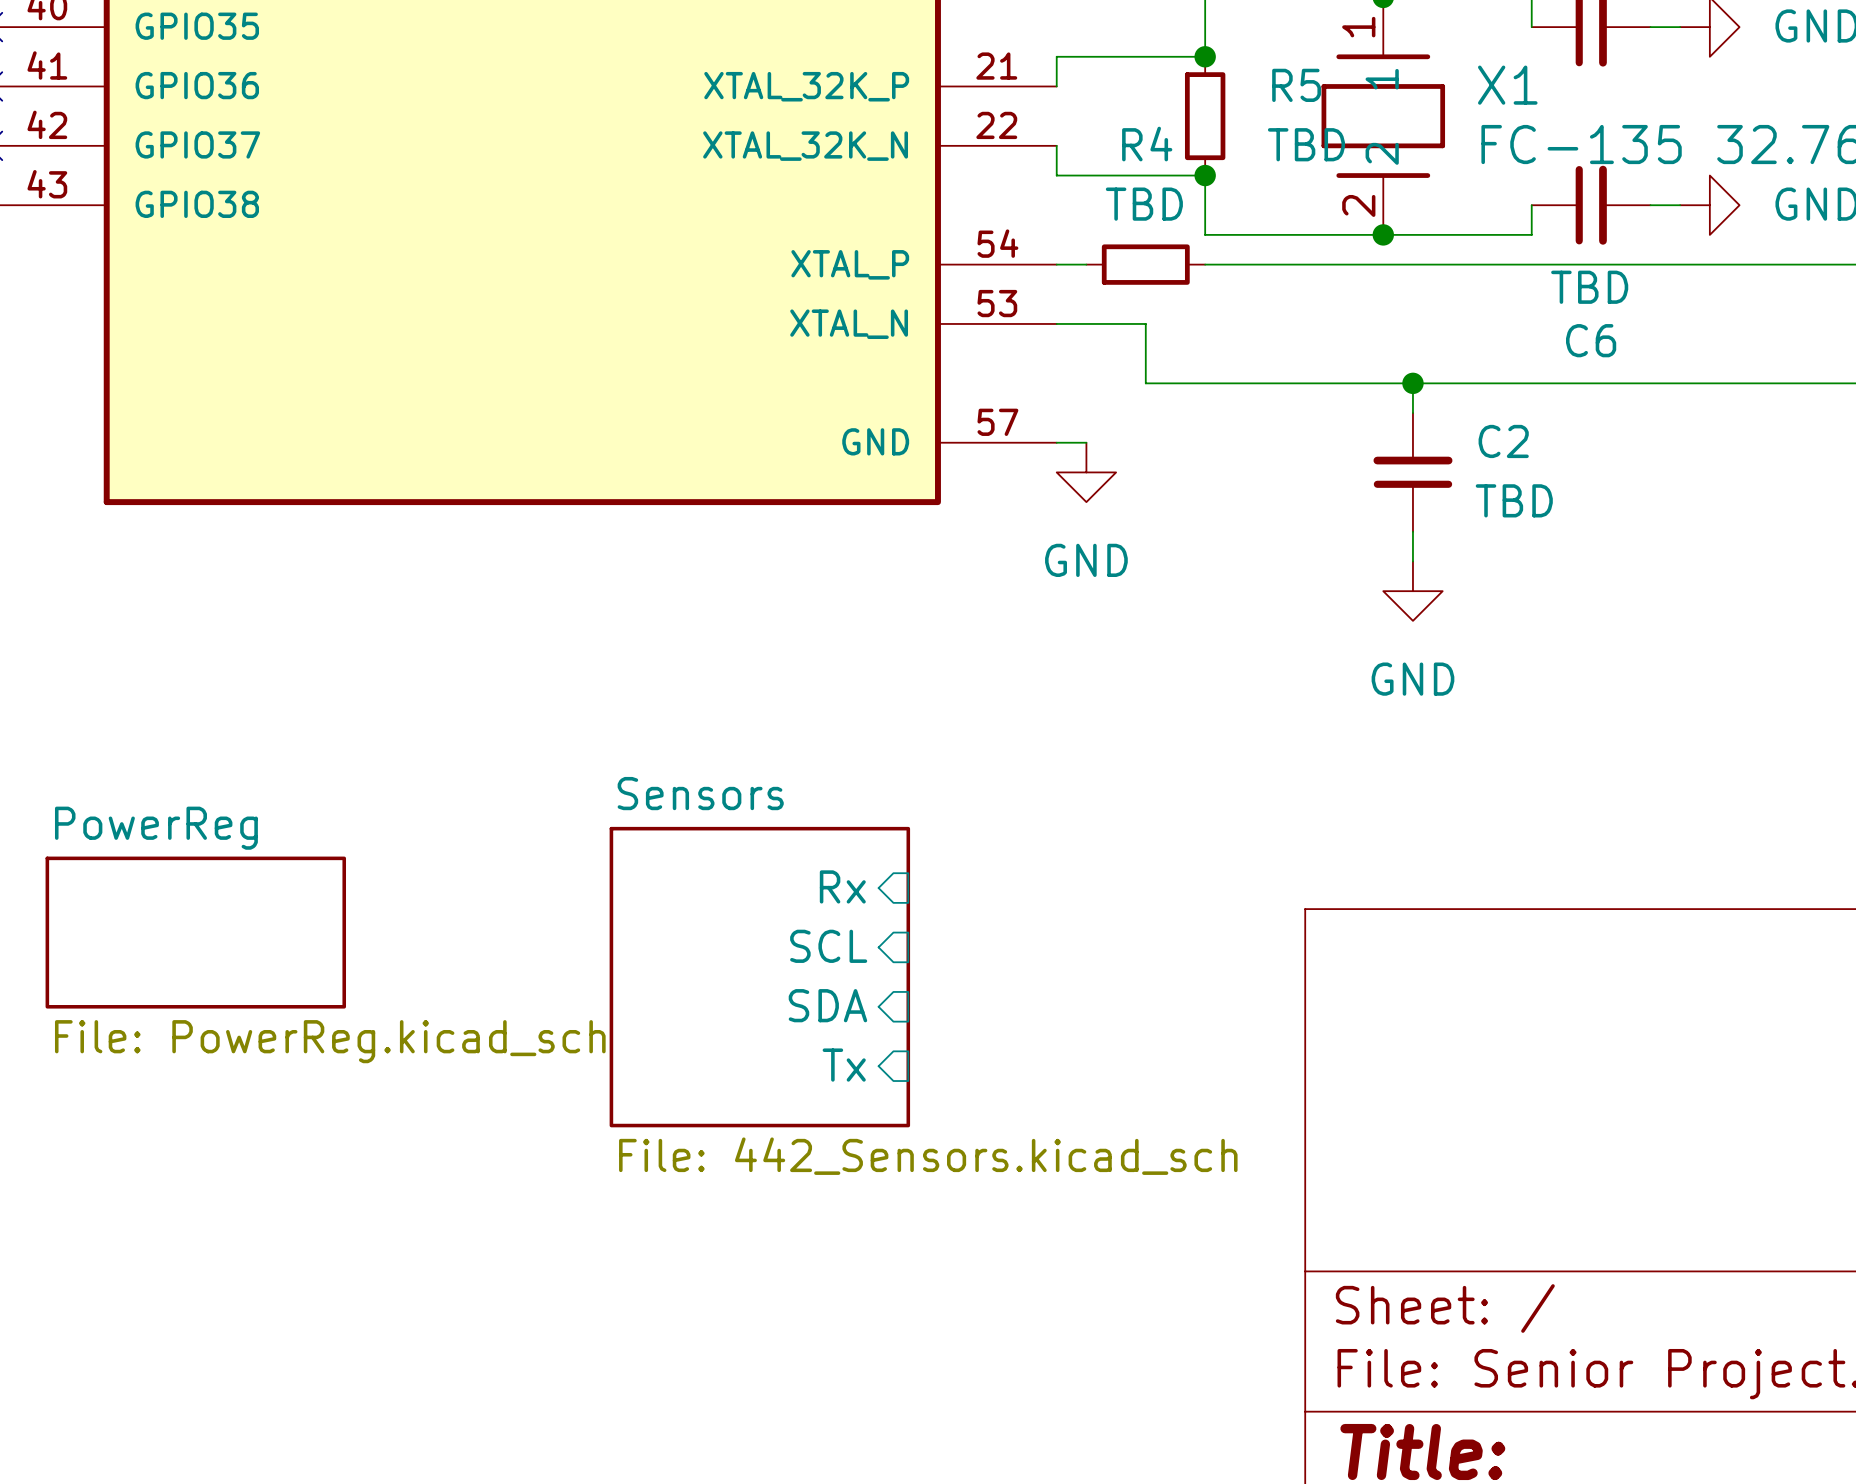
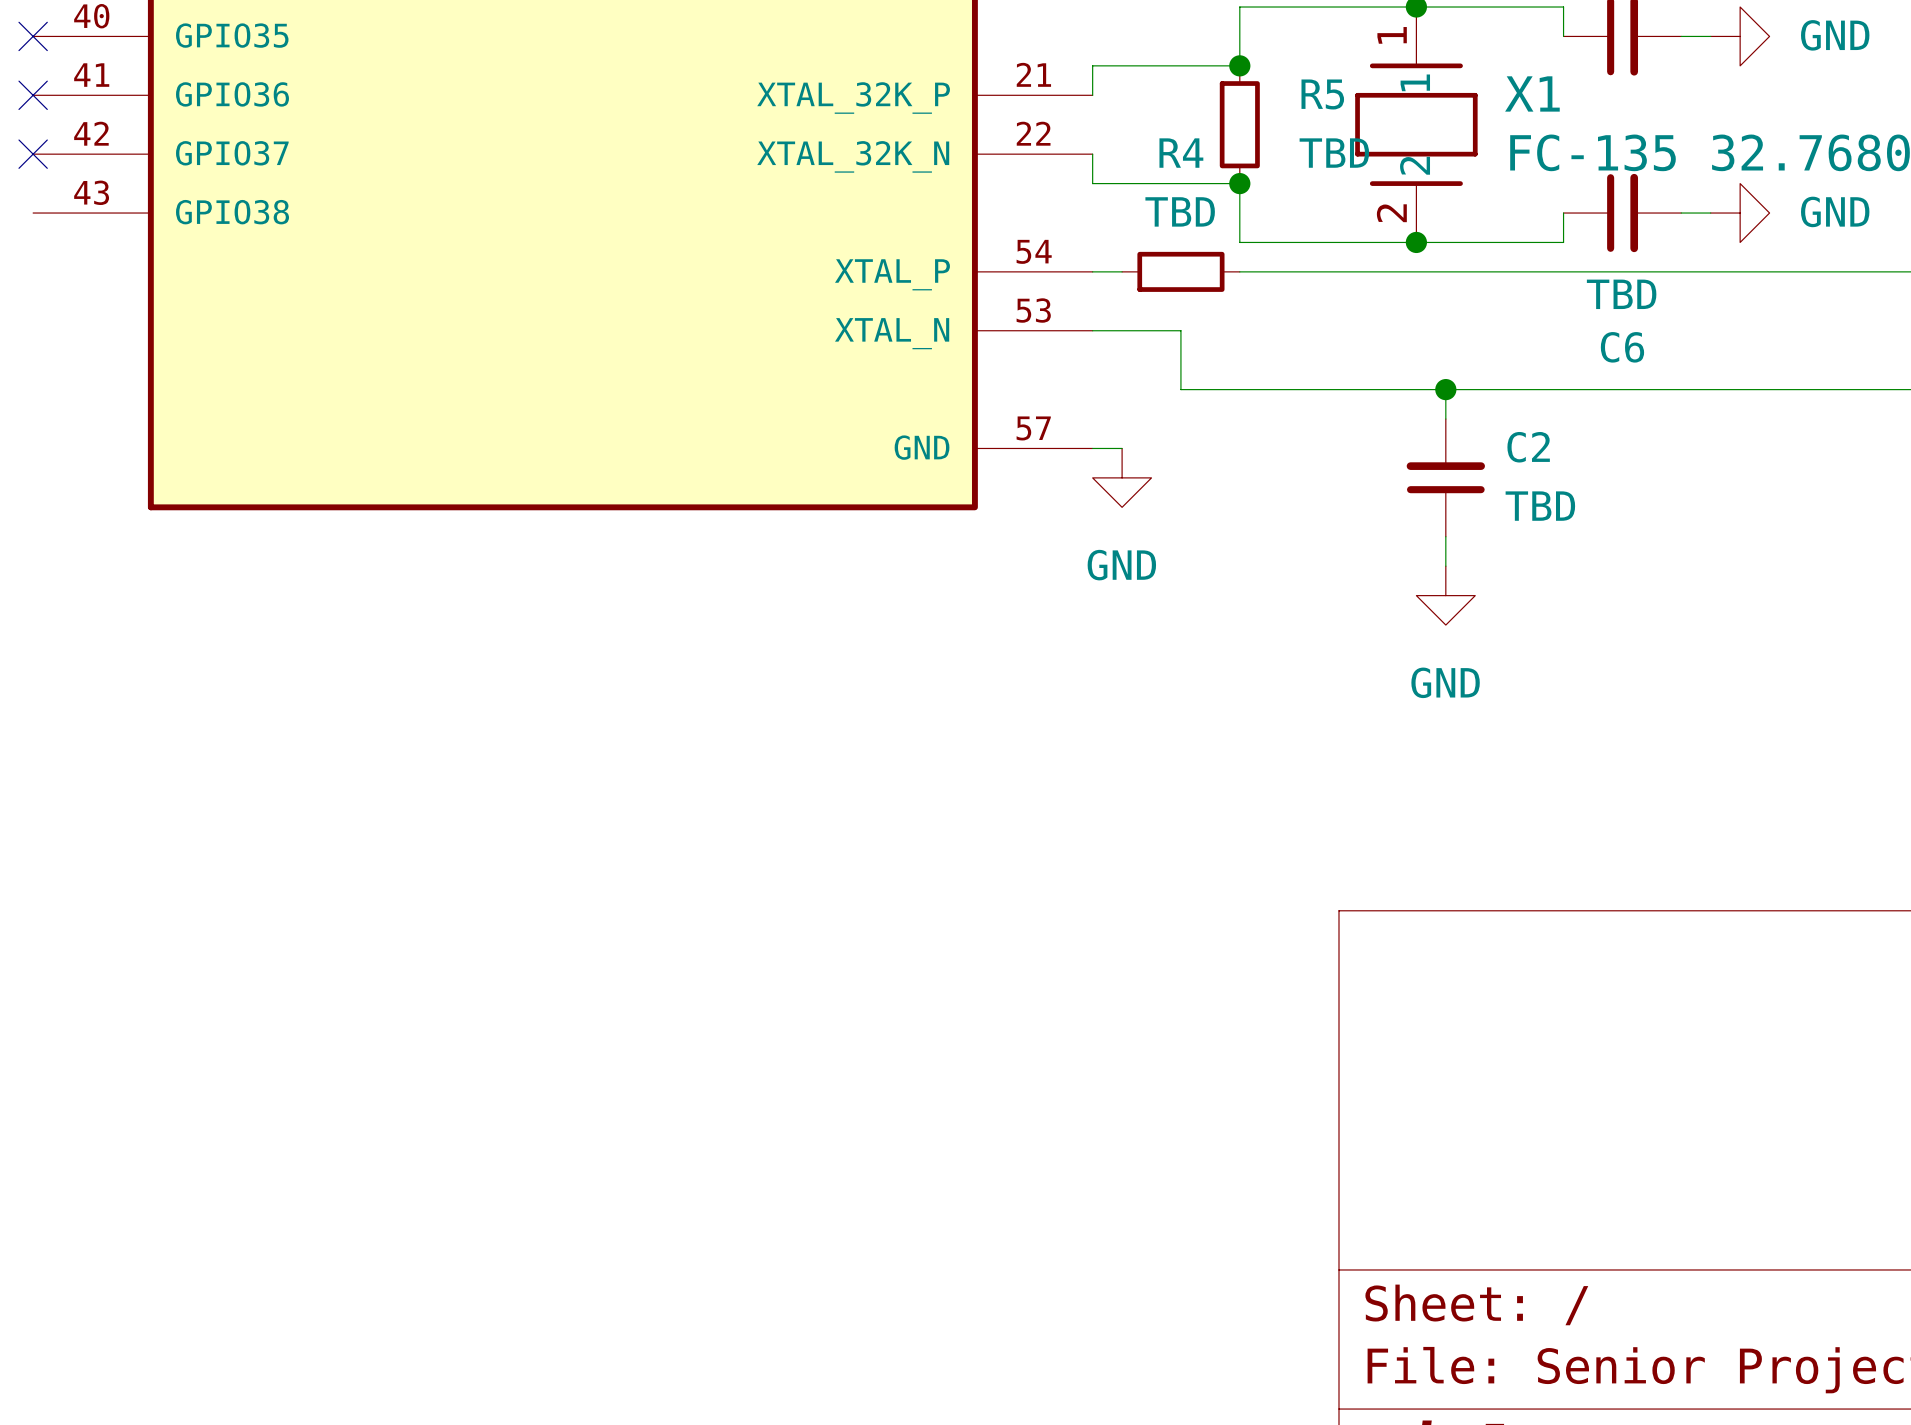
sheet pin: Rx (842, 886) -> none
sheet PowerReg: File: PowerReg.kicad_sch (195, 932) -> none
sheet pin: SCL (828, 946) -> none
sheet Sensors: File: 442_Sensors.kicad_sch (759, 977) -> none
sheet pin: SDA (827, 1005) -> none
sheet pin: Tx (844, 1065) -> none

